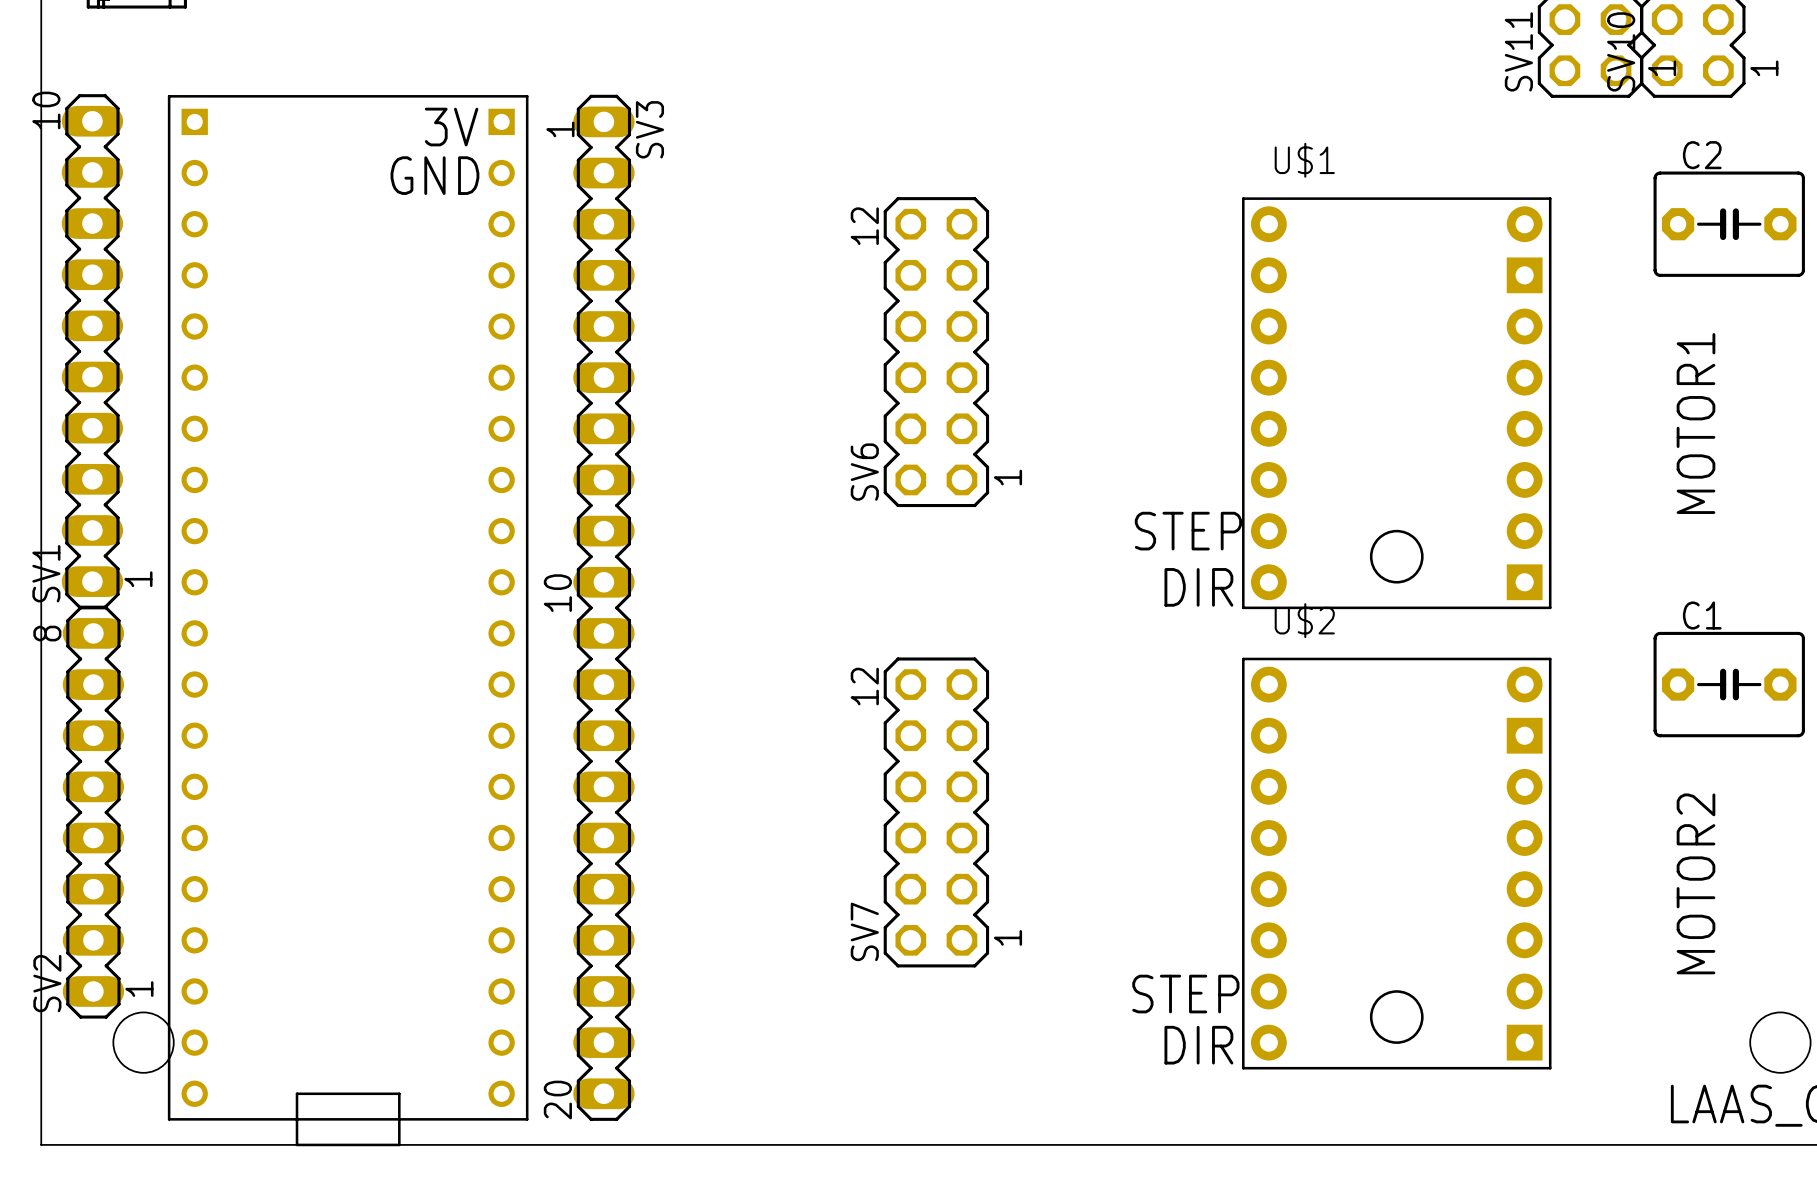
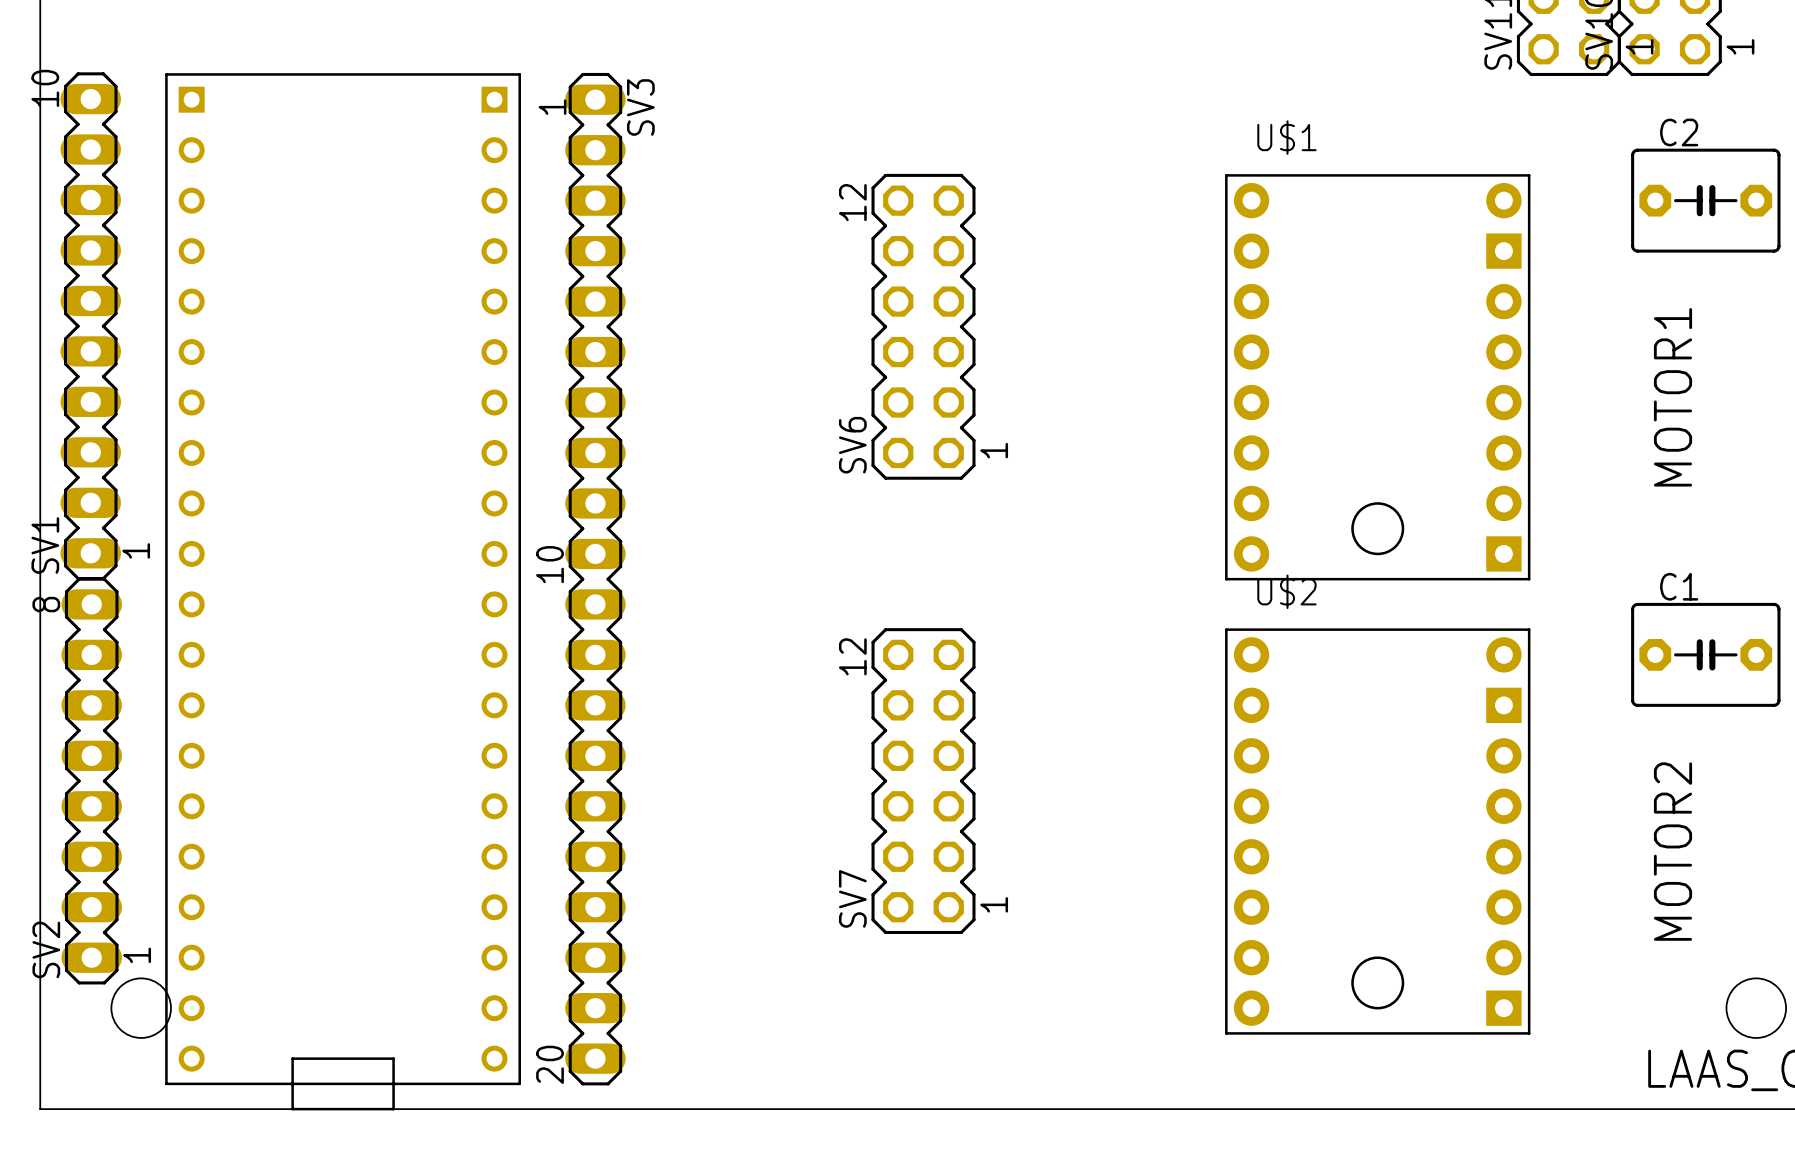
text: 3V (451, 127) -> none
text: GND (434, 175) -> none
text: STEP (1188, 531) -> none
text: DIR (1198, 587) -> none
text: STEP (1185, 994) -> none
text: DIR (1198, 1045) -> none

